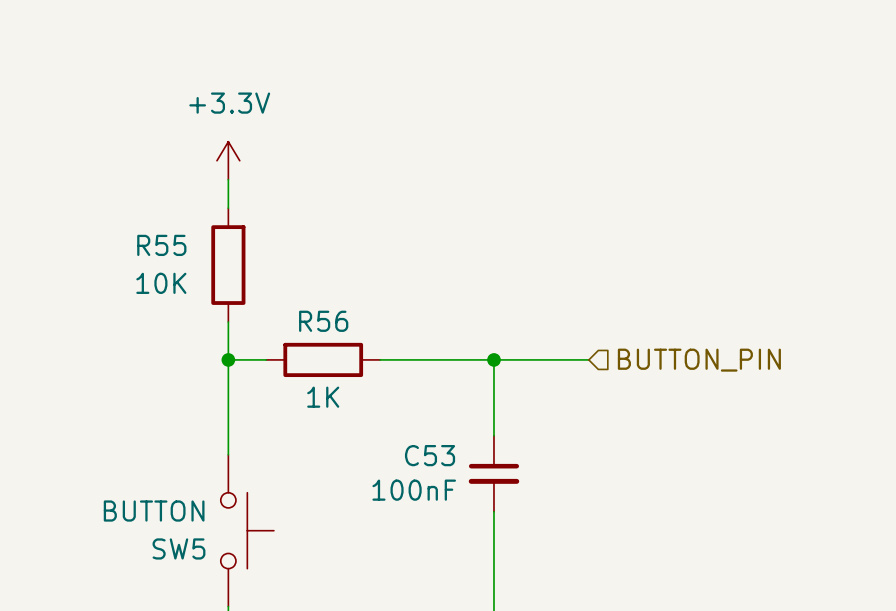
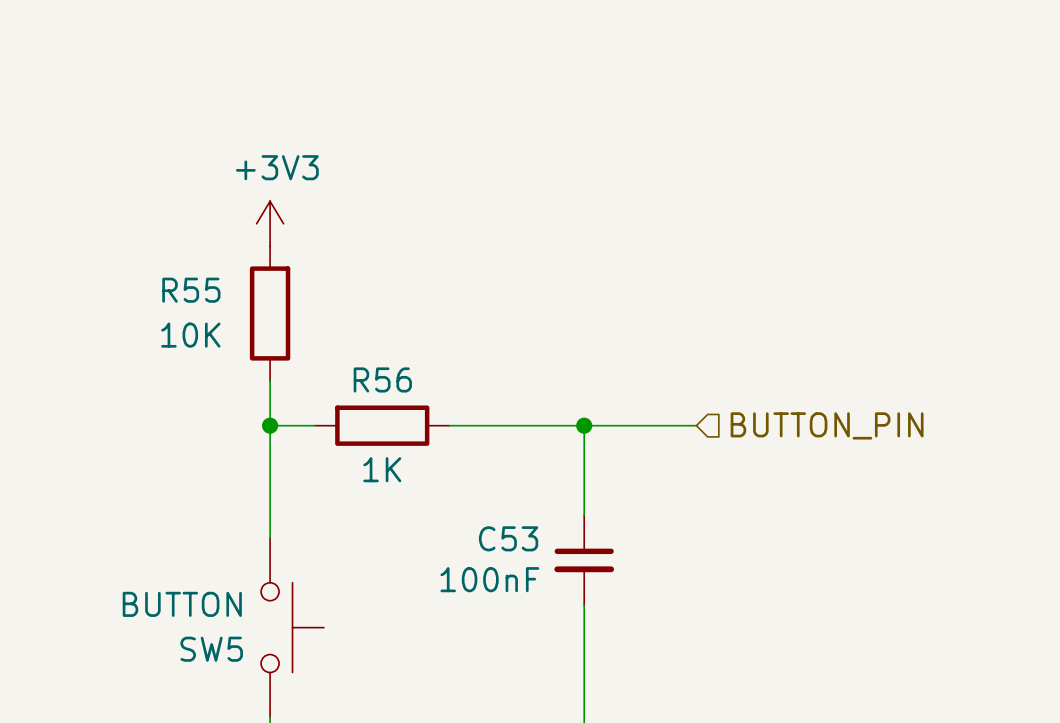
power symbol: +3.3V (228, 160) -> none
power symbol: none -> +3V3 (270, 223)

